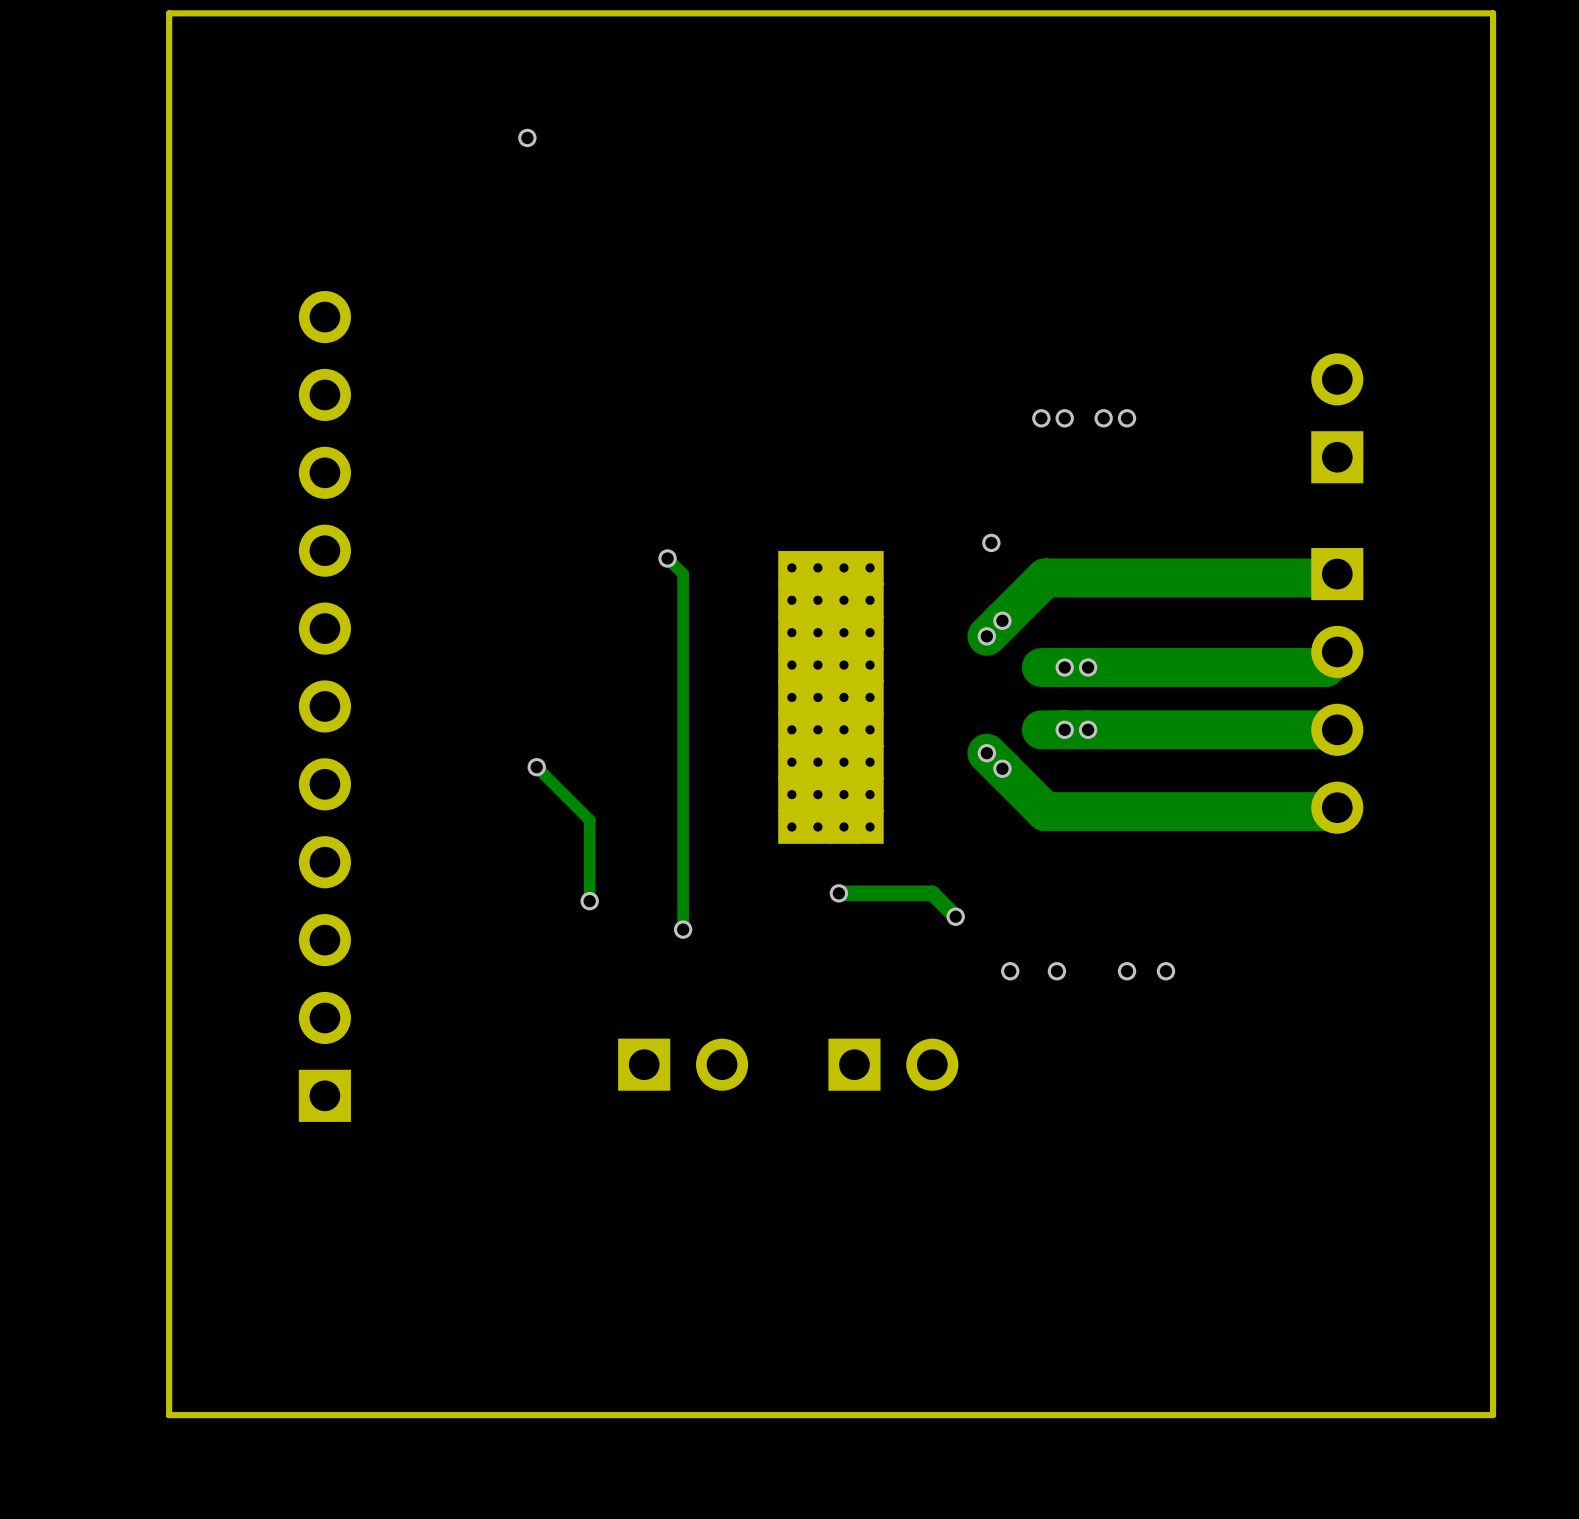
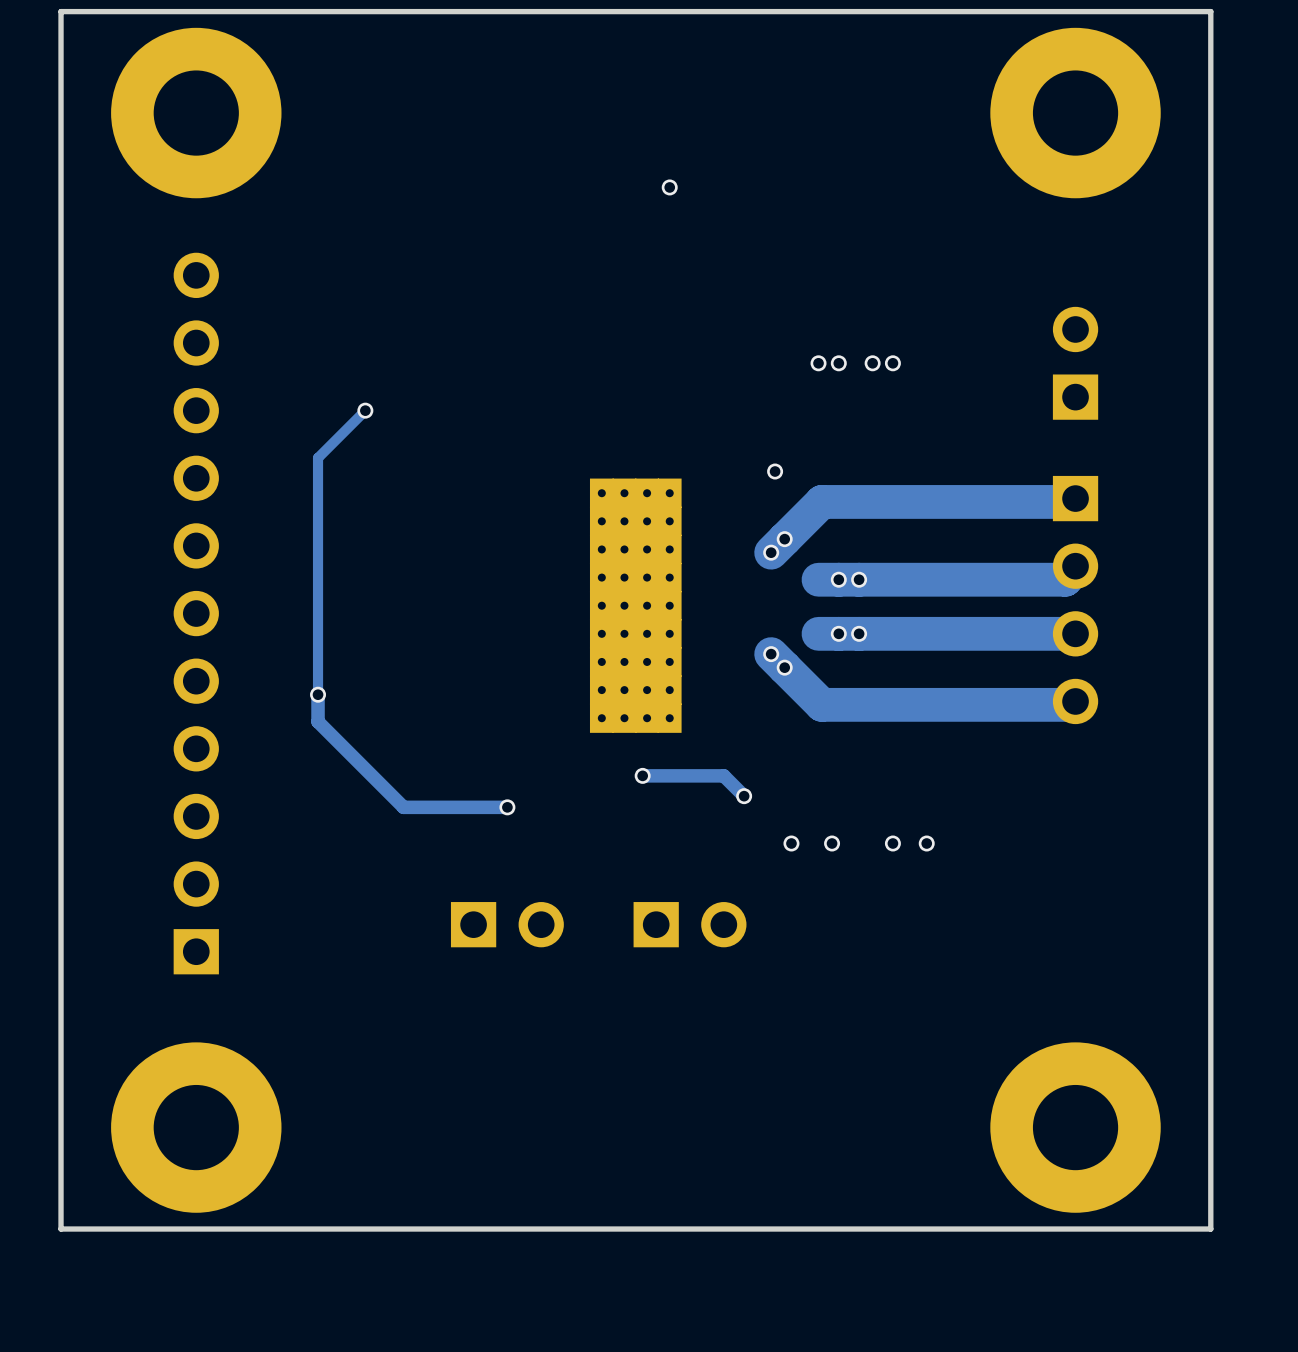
part: none -> (196, 113)
part: none -> (1075, 113)
via: (527, 137) -> none
via: none -> (669, 187)
via: none -> (365, 410)
track: (667, 558) (683, 574) (683, 929) -> (365, 410) (318, 457) (318, 721) (403, 807) (507, 807)
via: (667, 558) -> none
track: (536, 767) (589, 820) (589, 901) -> none
via position: (536, 767) -> (318, 694)
via: (589, 901) -> none
part: none -> (196, 1127)
part: none -> (1075, 1127)

